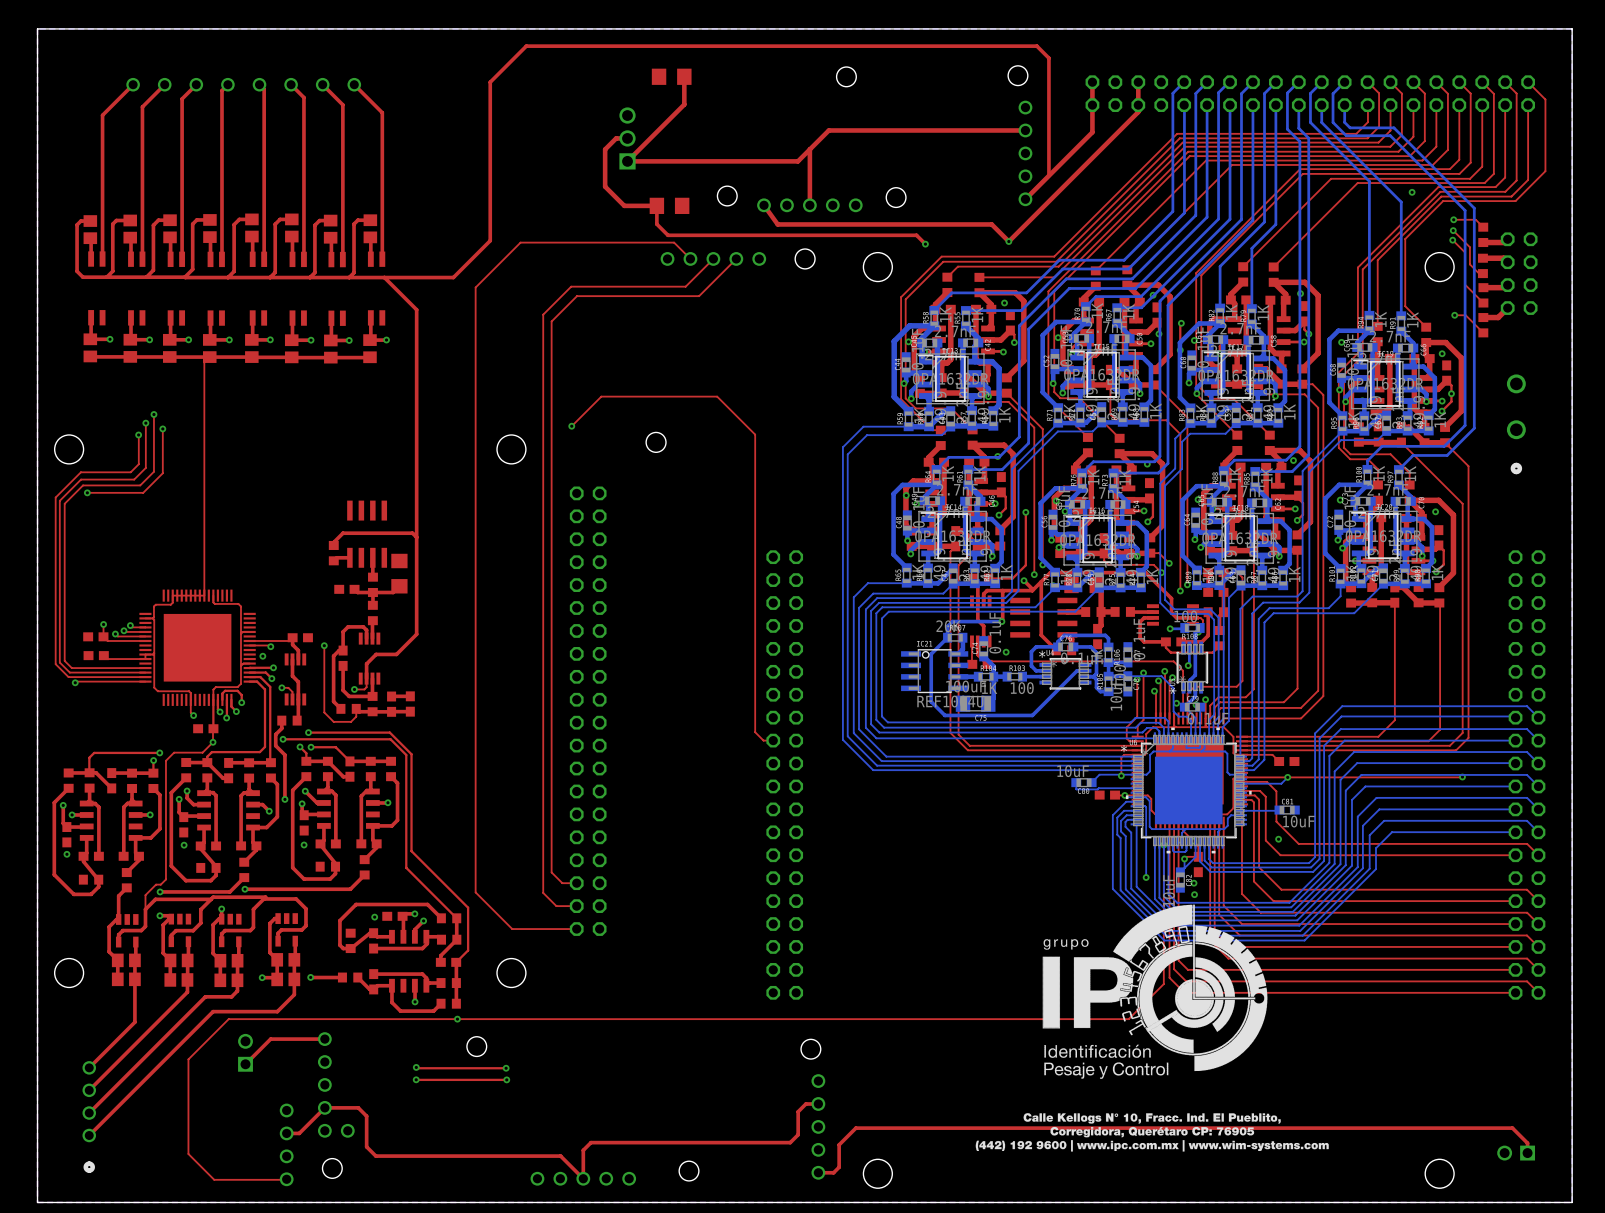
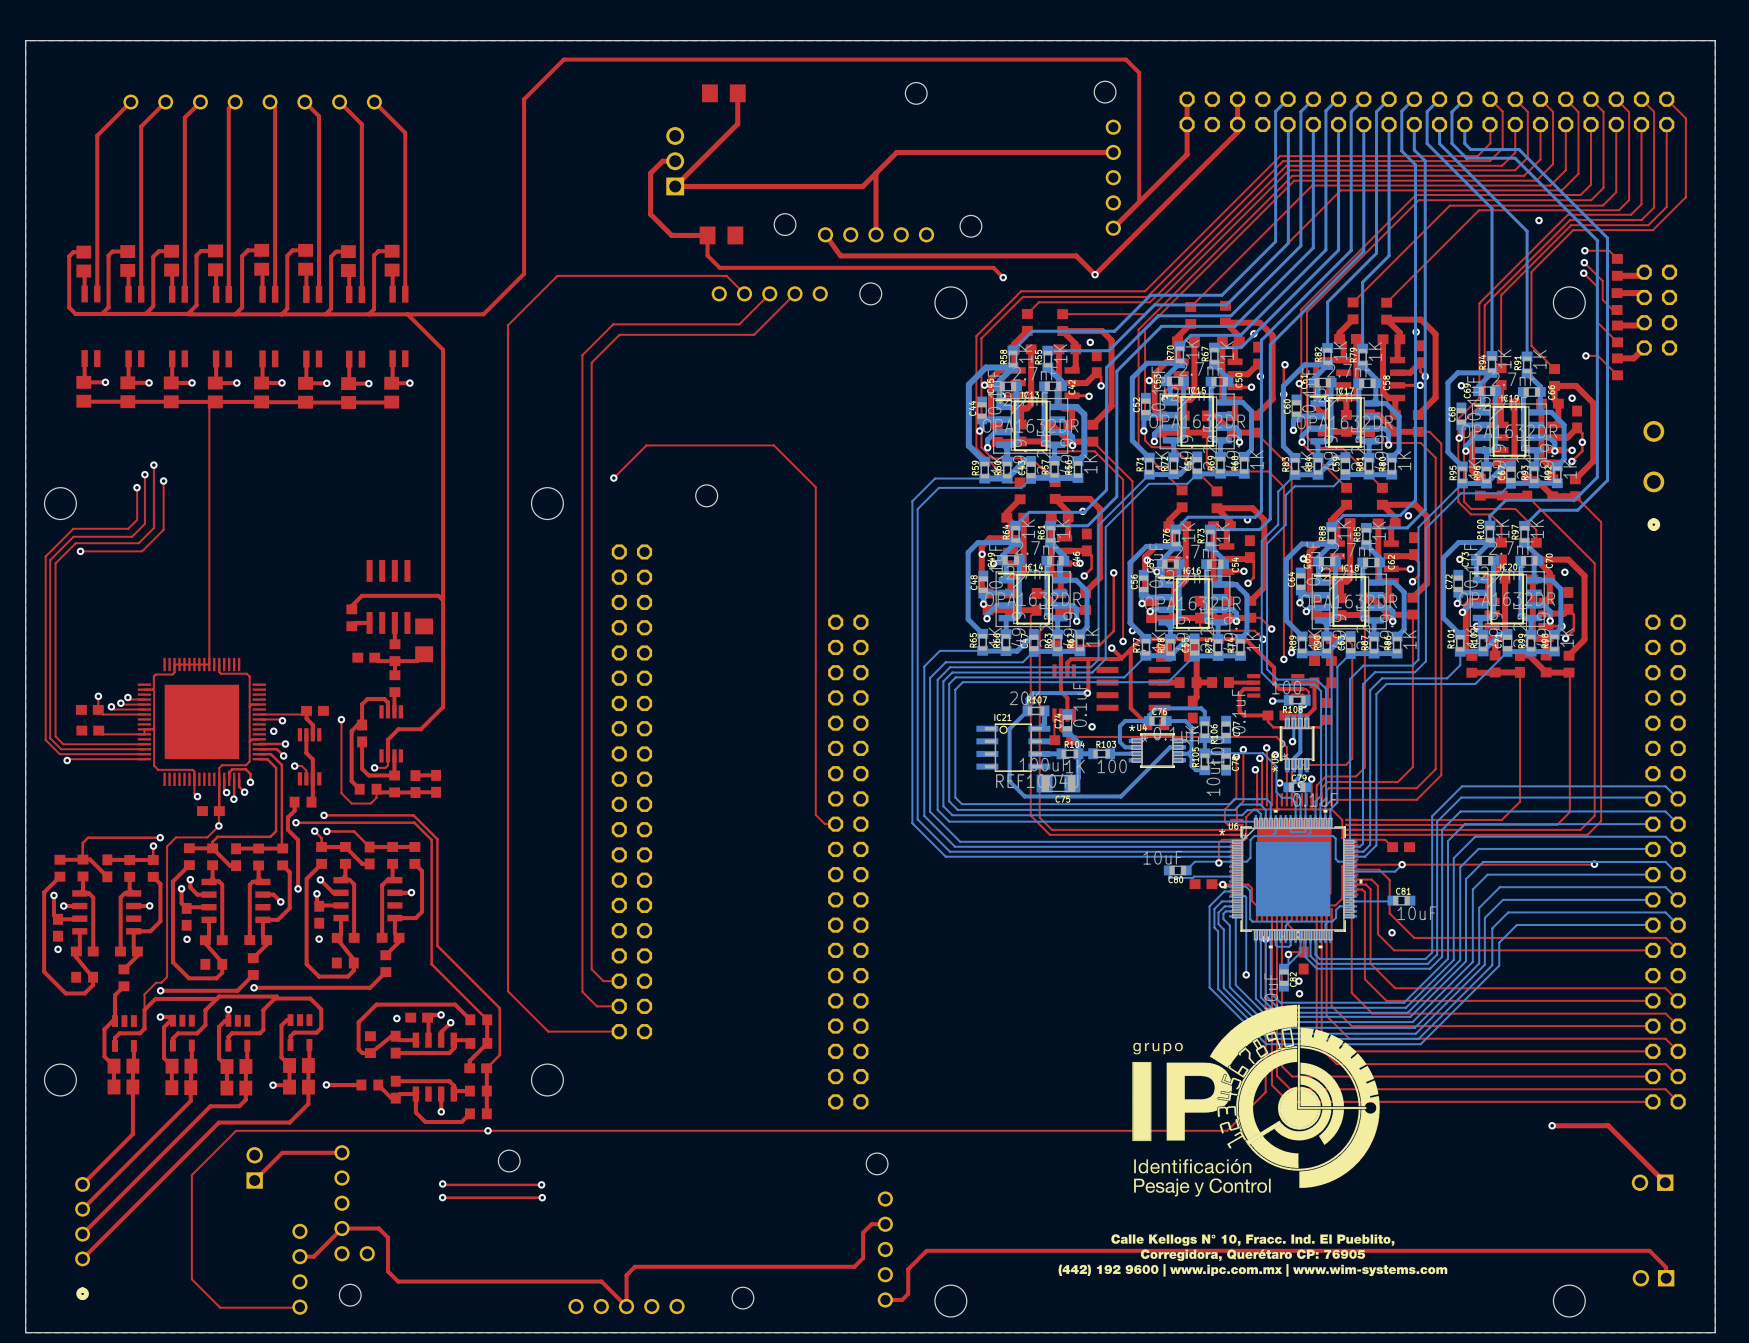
top track: none -> (1552, 1125) (1608, 1125) (1665, 1182)
via: none -> (1552, 1125)
part: none -> (1652, 1182)

